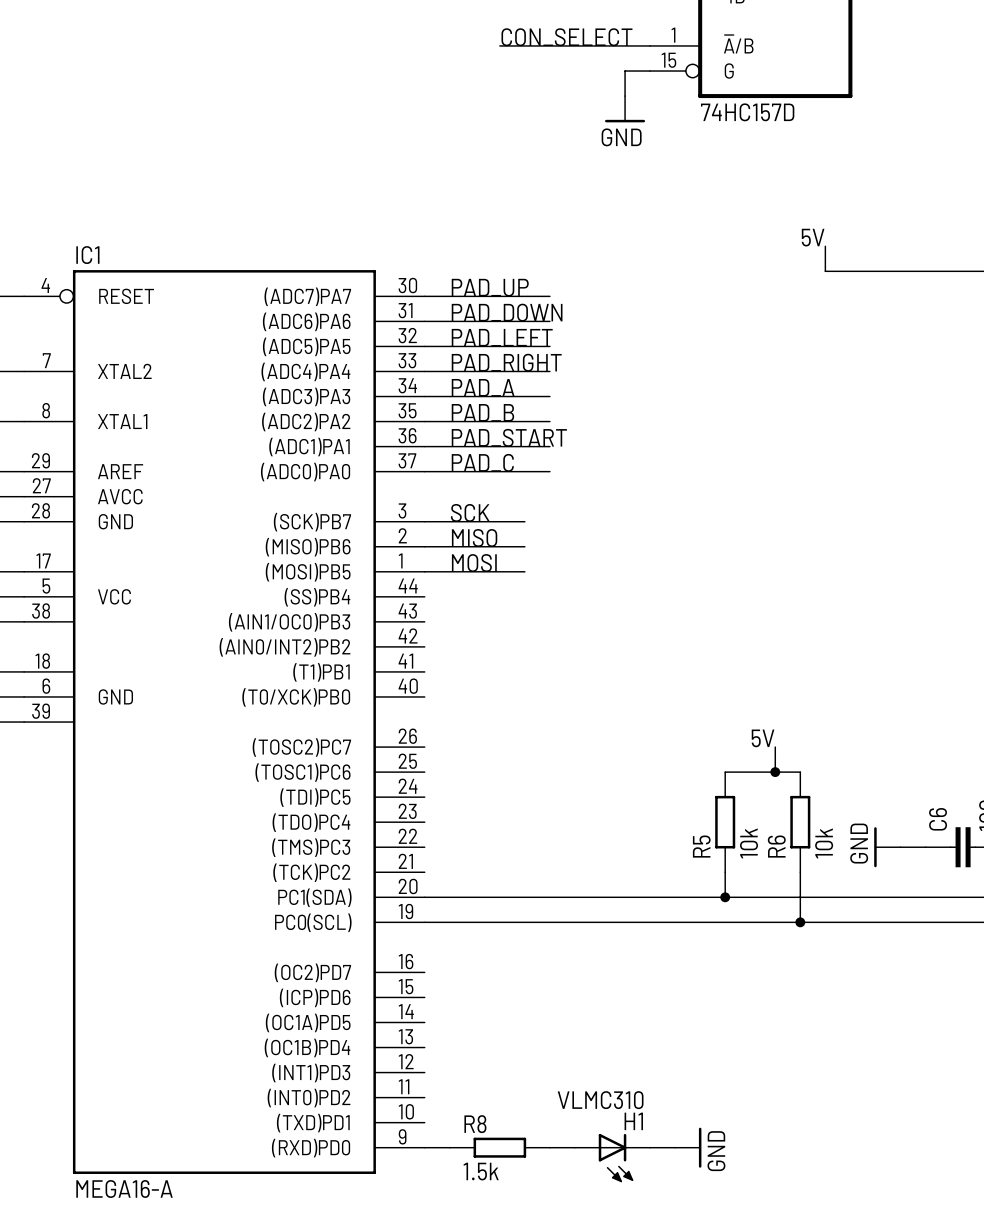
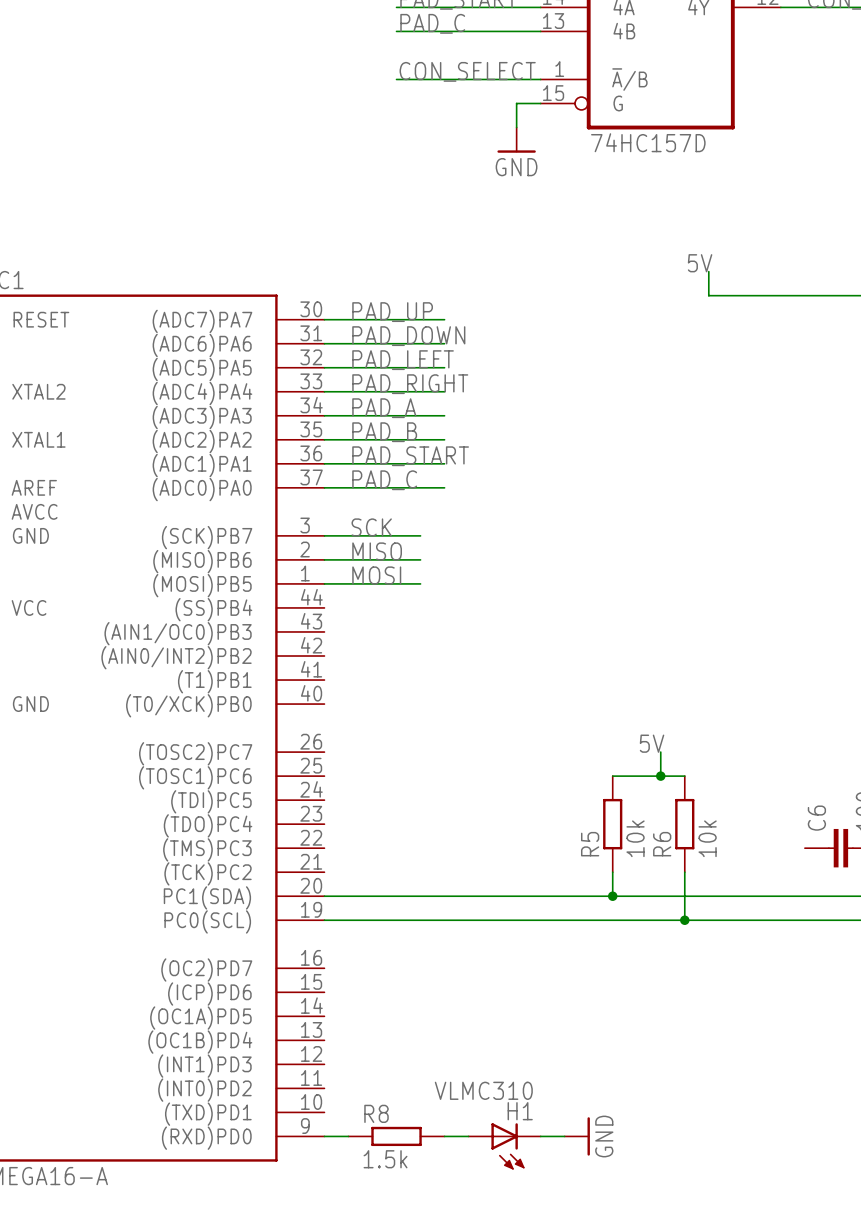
power symbol: GND (887, 847) -> none
wire: (900, 847) (925, 847) -> none

